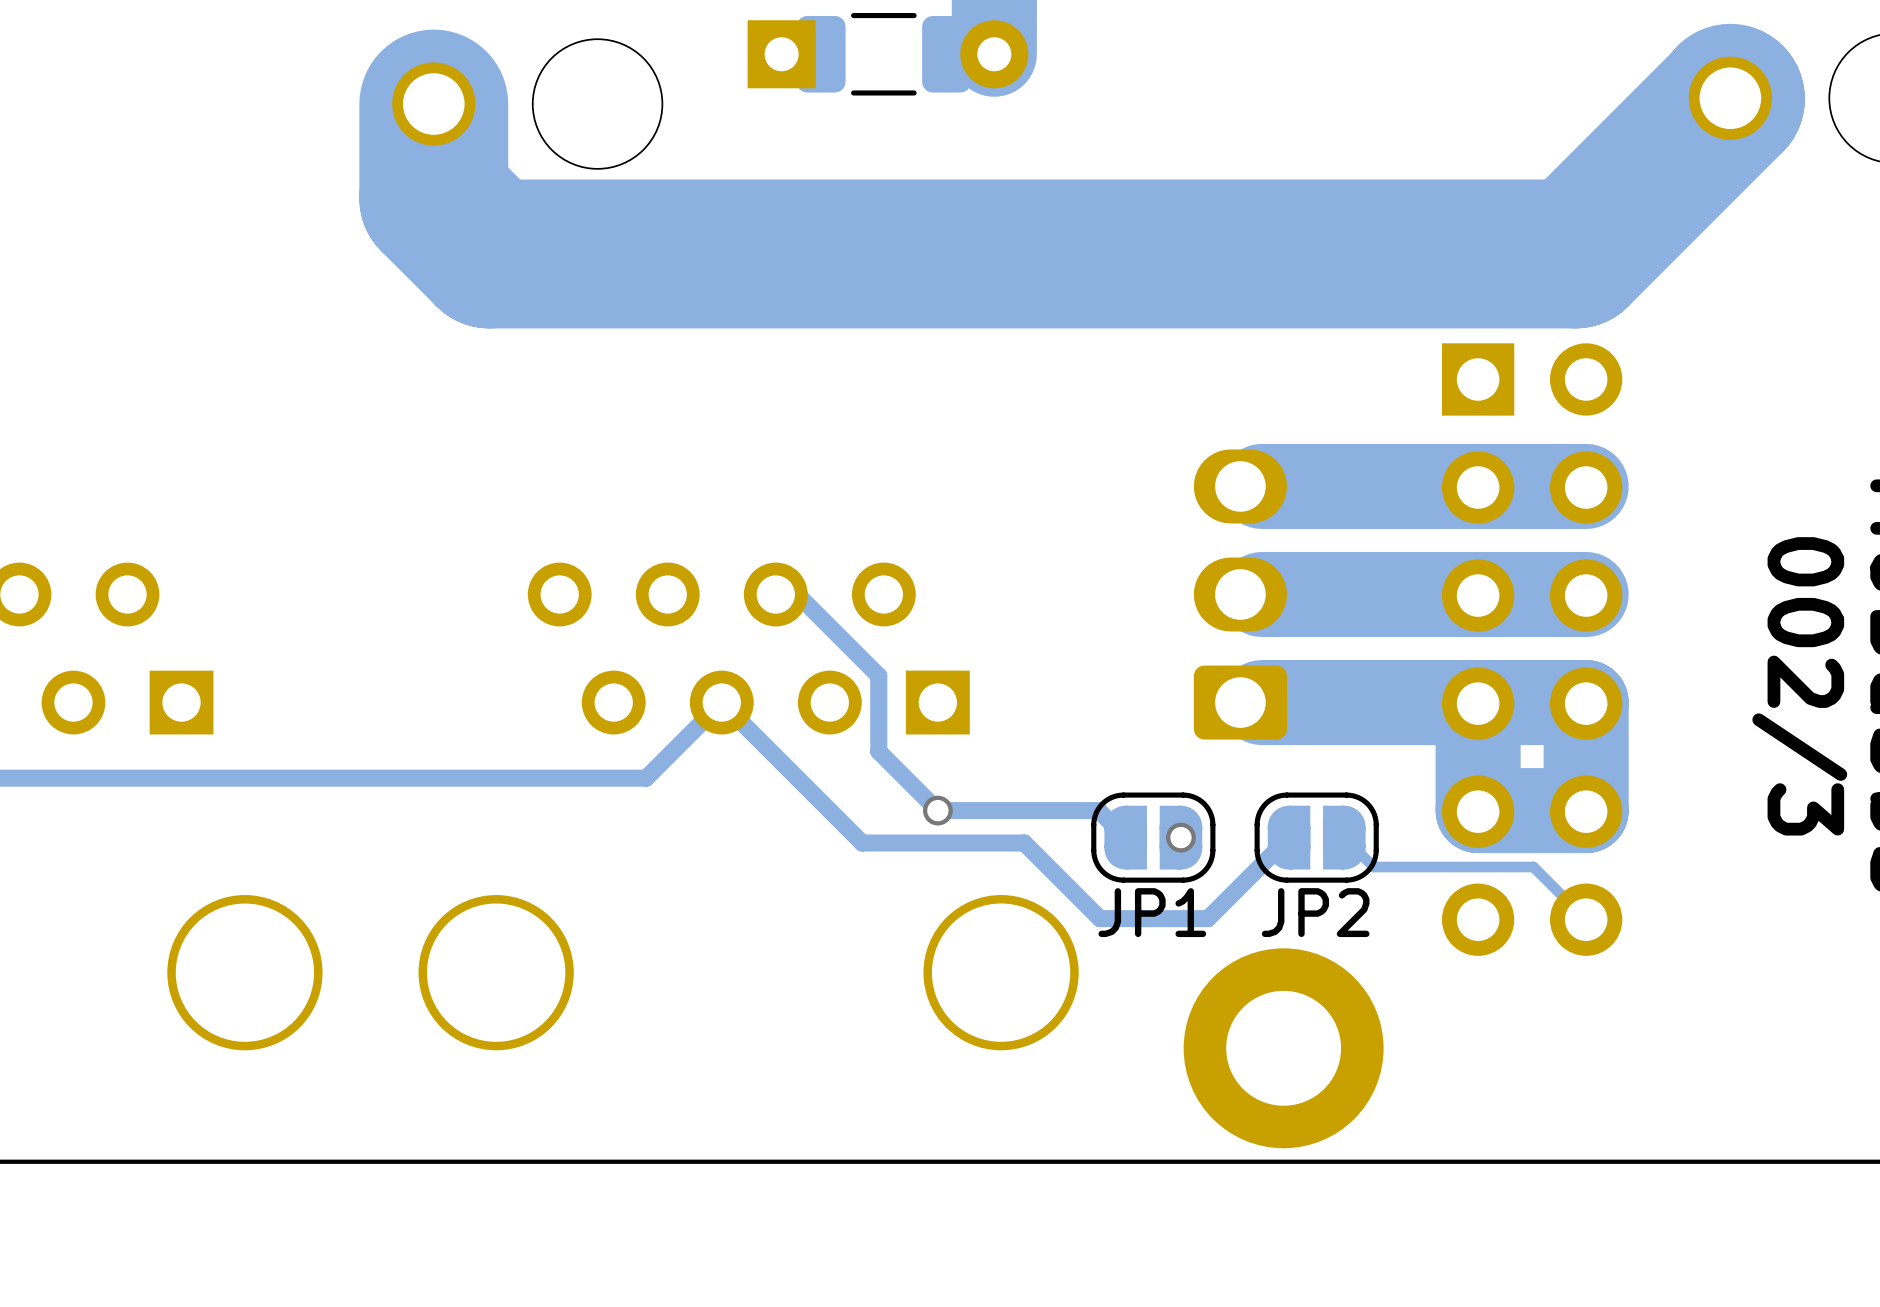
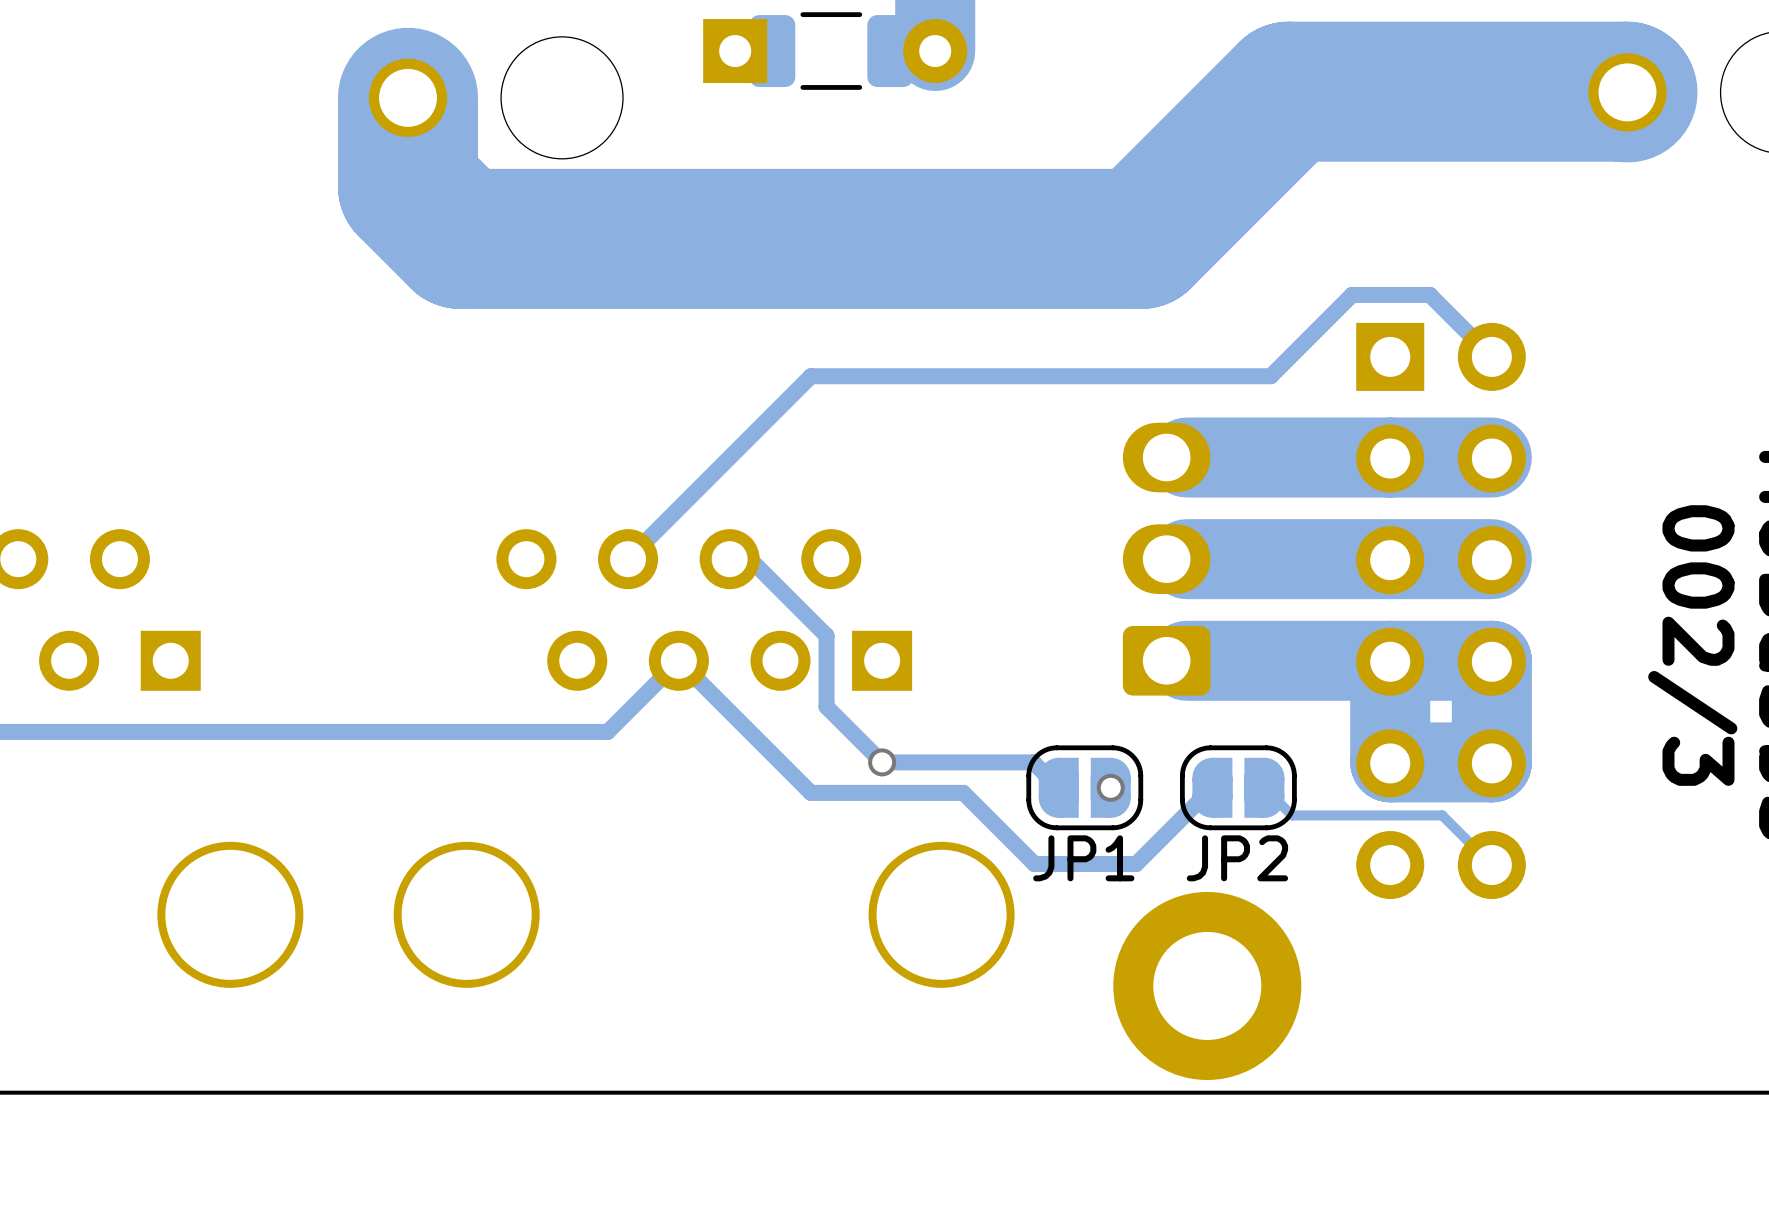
track: (1730, 98) (1575, 253) (1213, 253) -> (1627, 92) (1288, 91) (1141, 238)
track: none -> (1491, 356) (1429, 294) (1352, 294) (1270, 376) (810, 376) (628, 559)

